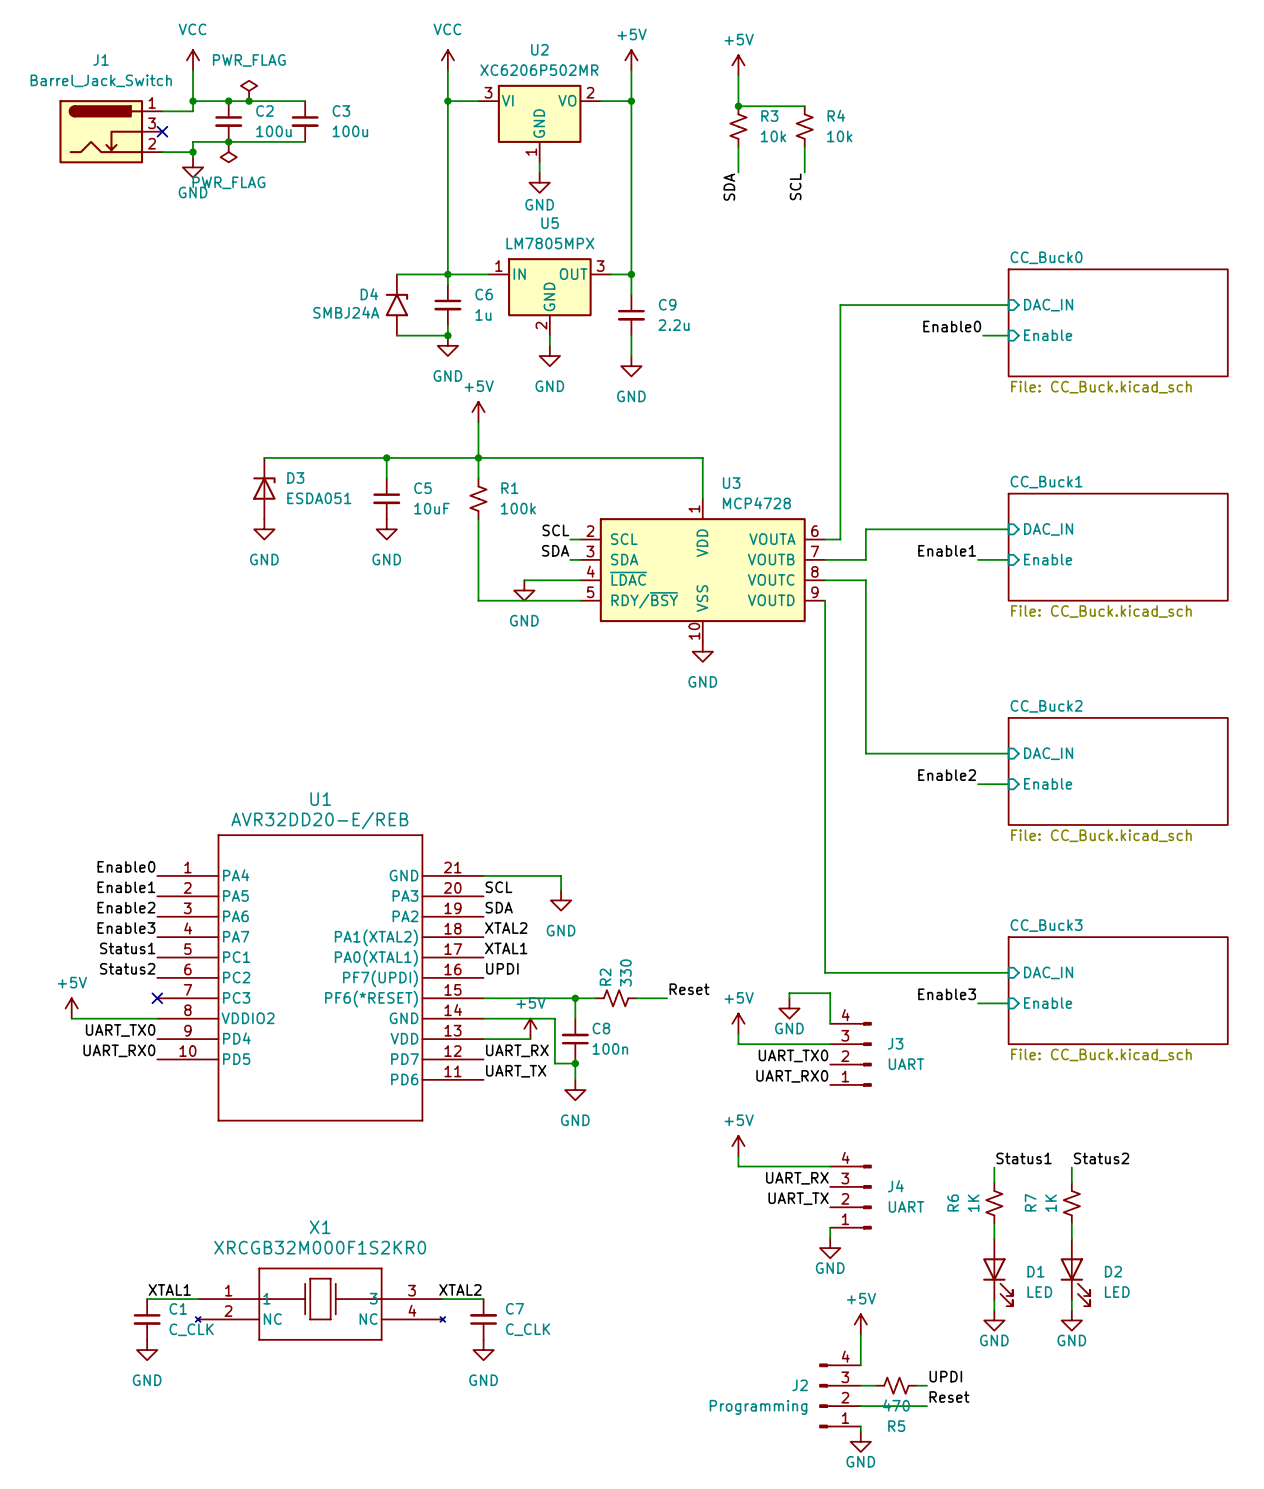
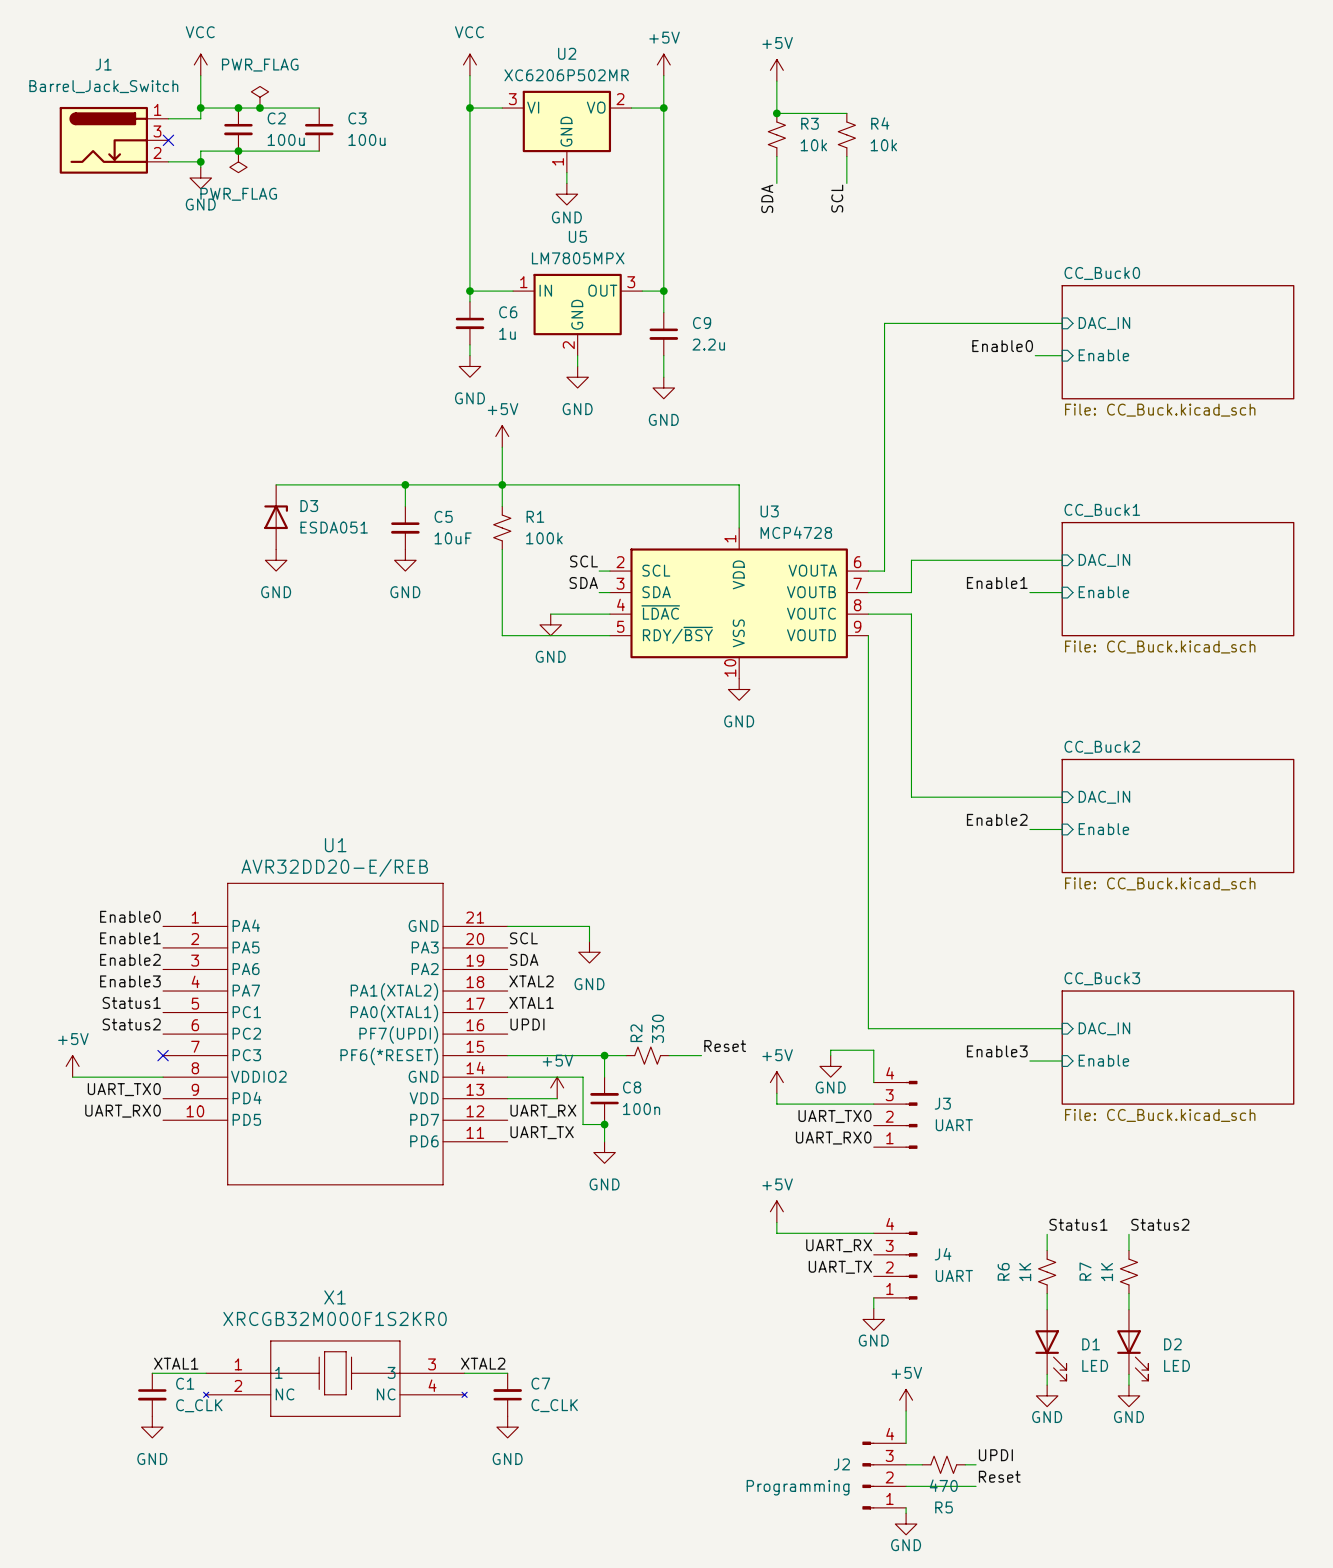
wire: (396, 274) (447, 274) -> none
D4: SMBJ24A (396, 305) -> none
wire: (396, 335) (447, 335) -> none
junction: (447, 335) -> none

